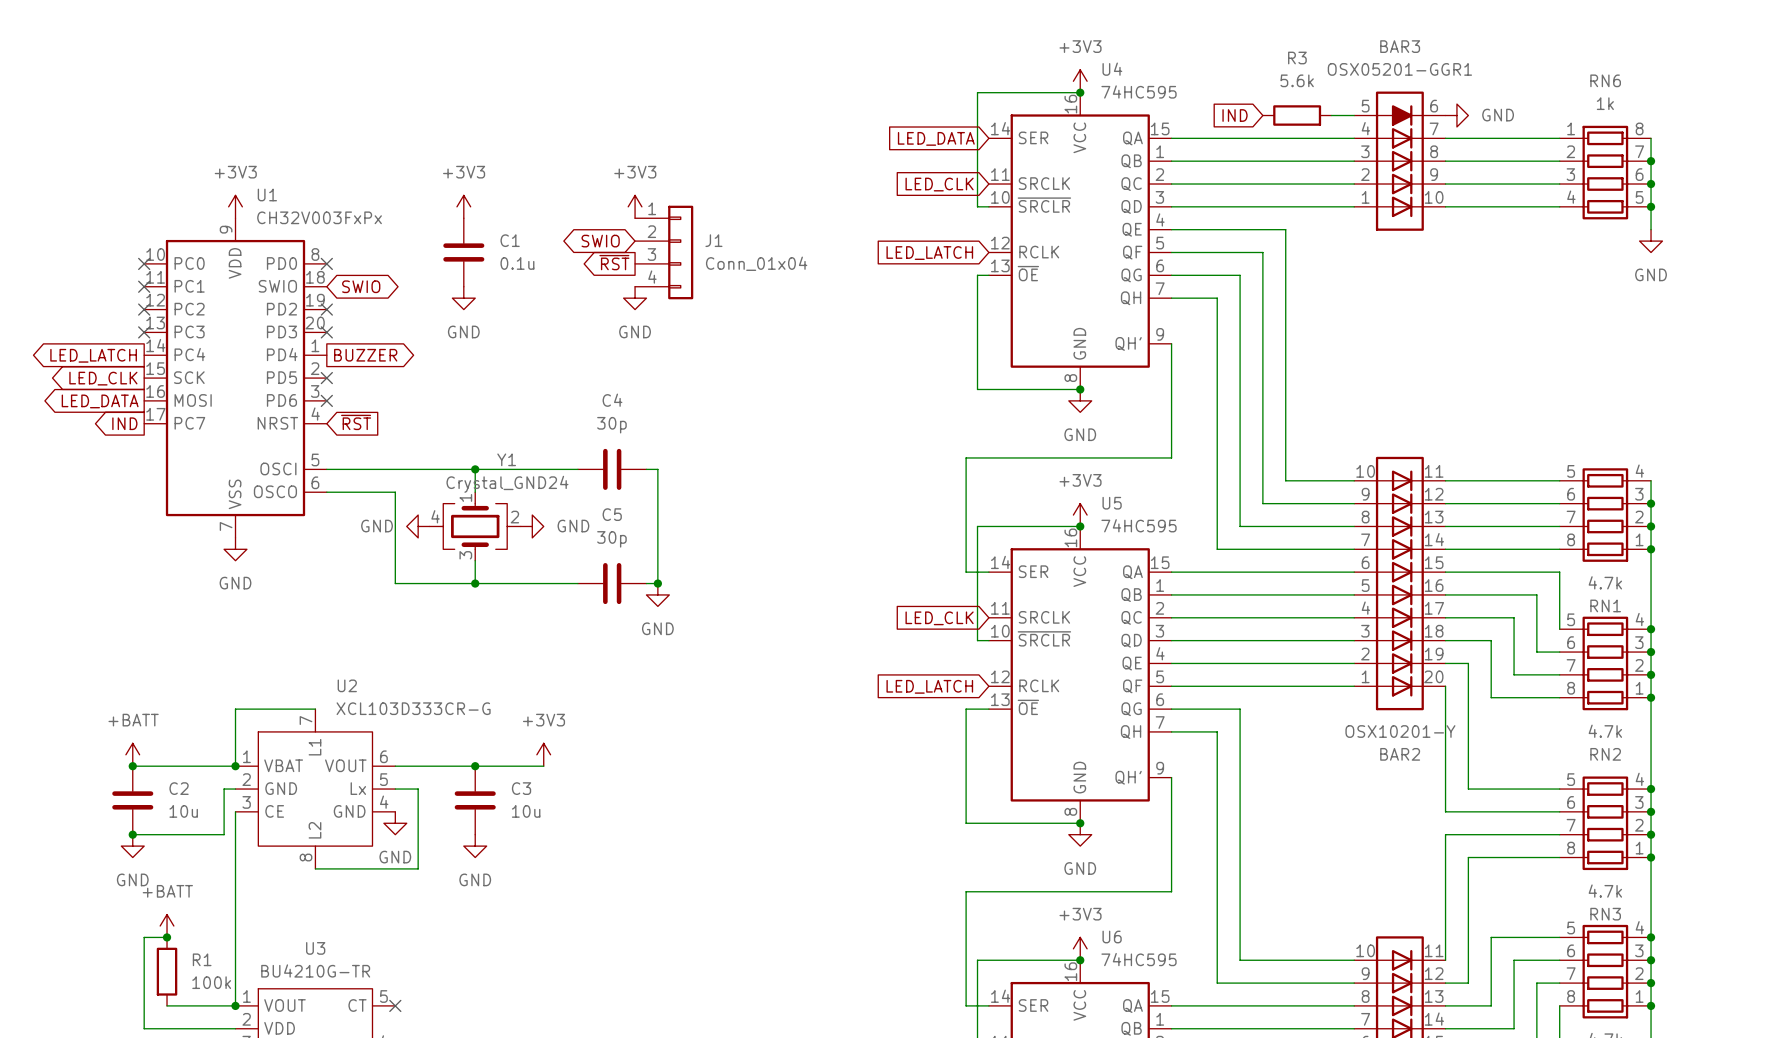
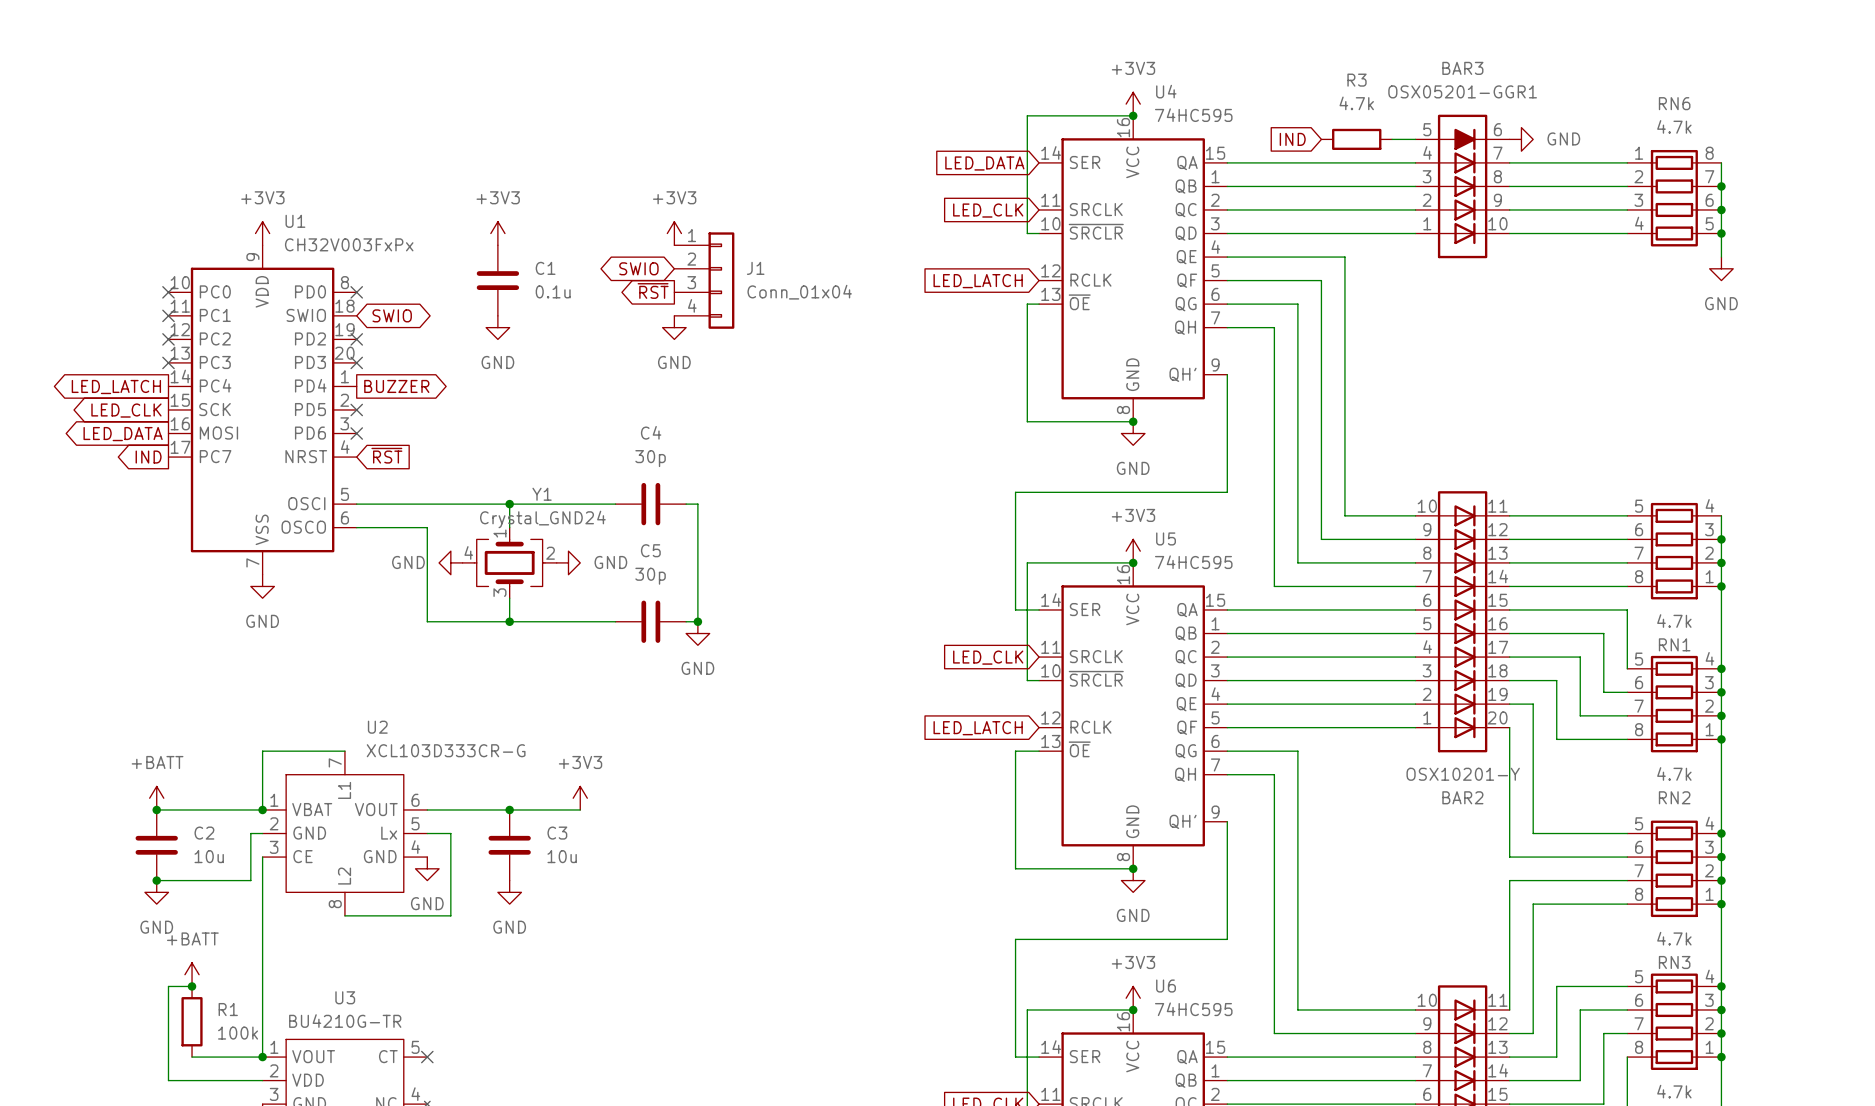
R3 value: 5.6k (1297, 80) -> 4.7k (1356, 103)
RN6 value: 1k (1605, 103) -> 4.7k (1674, 126)

